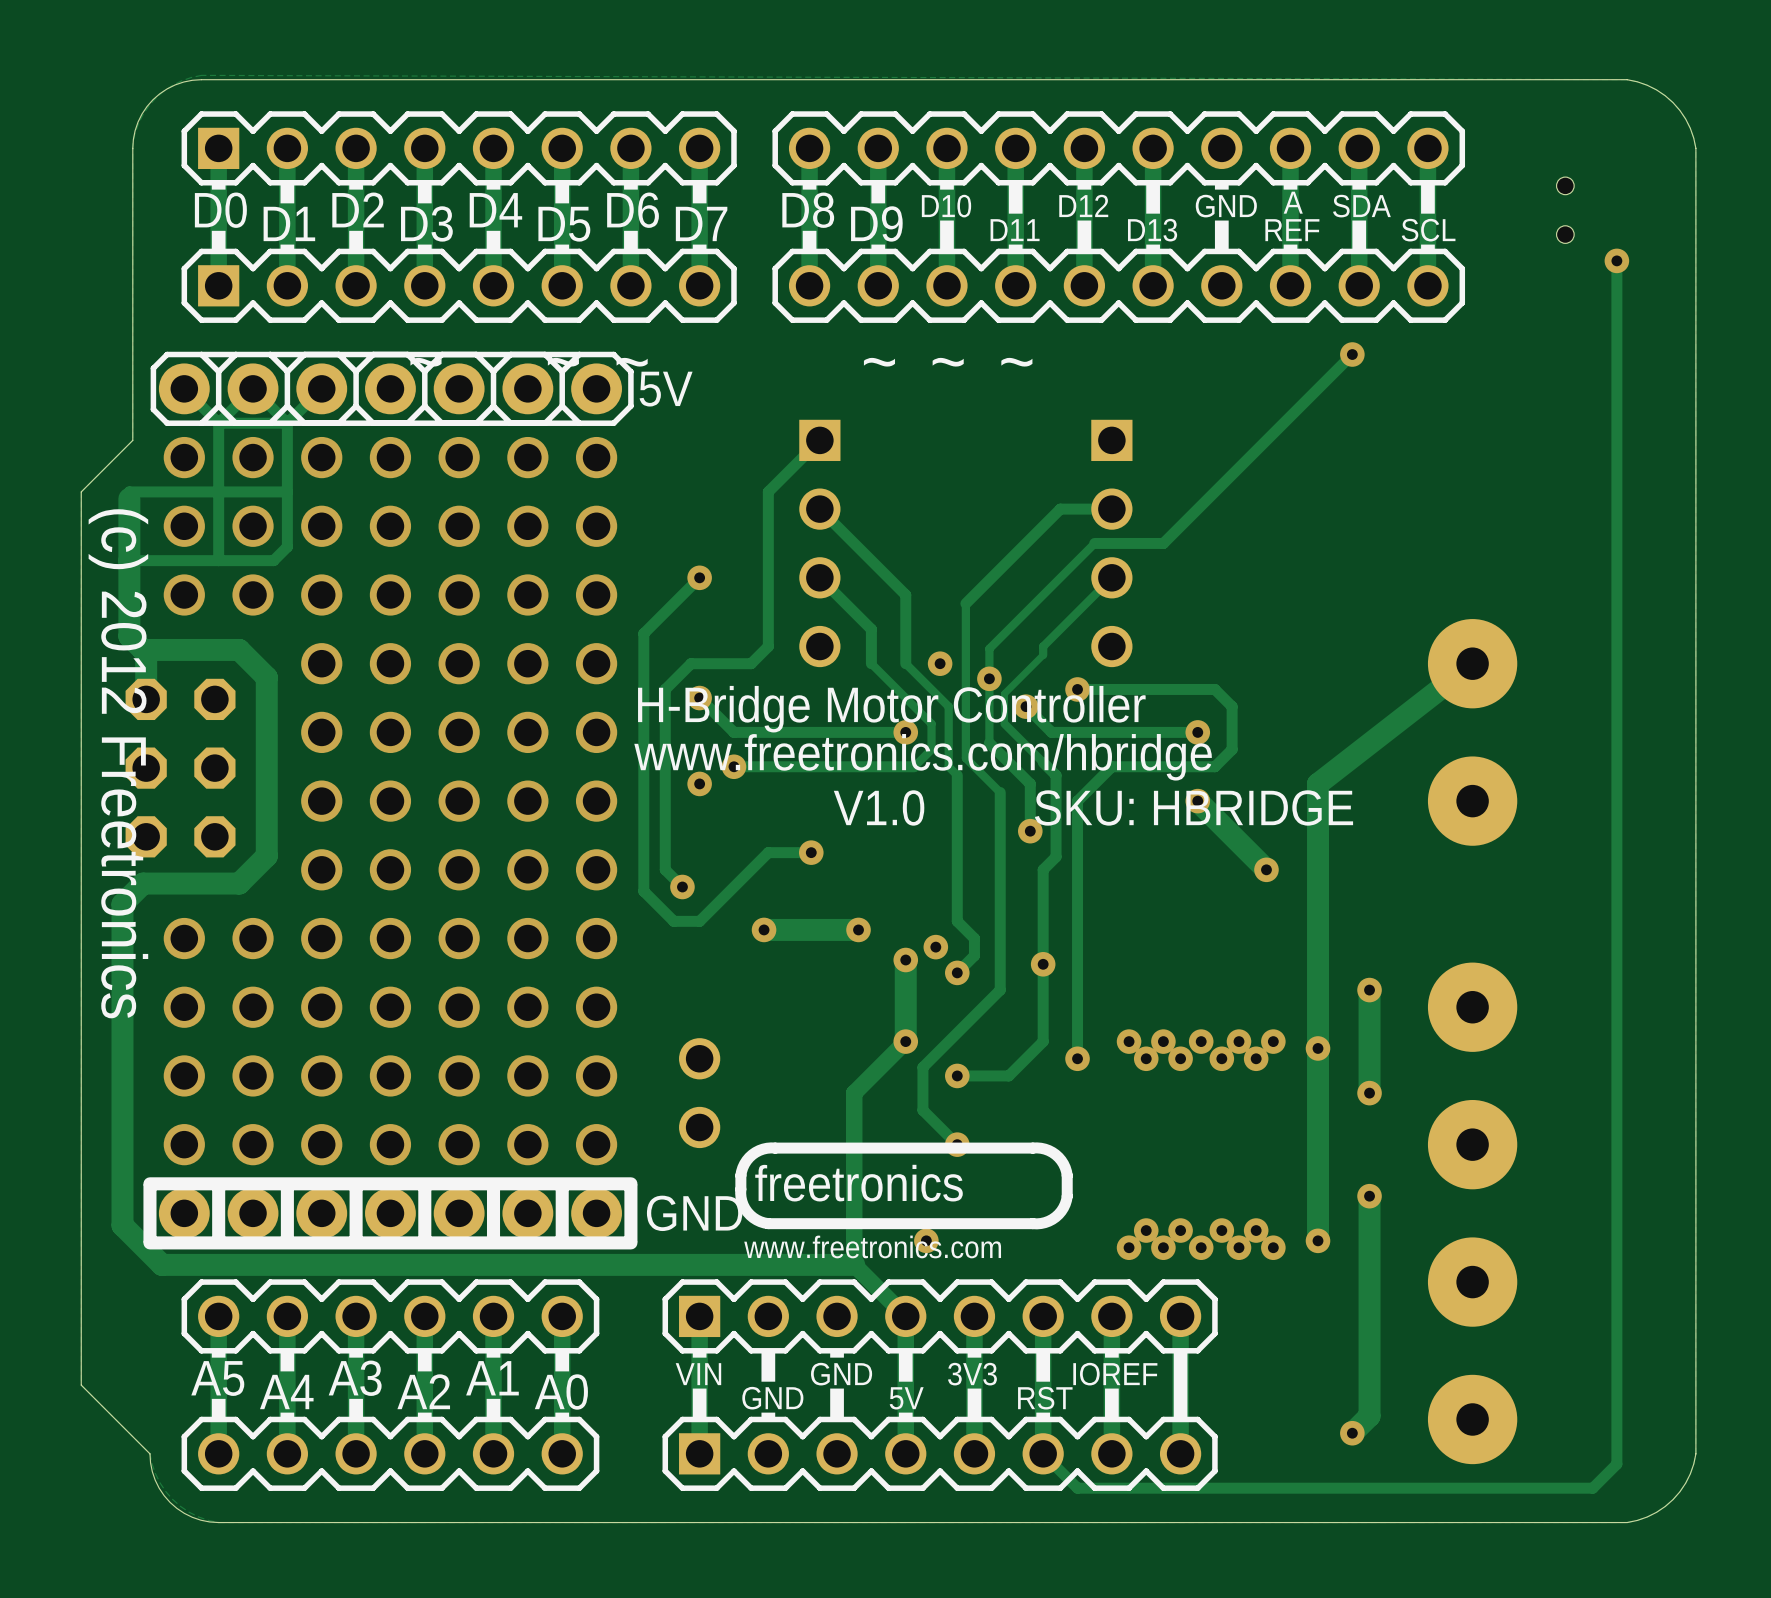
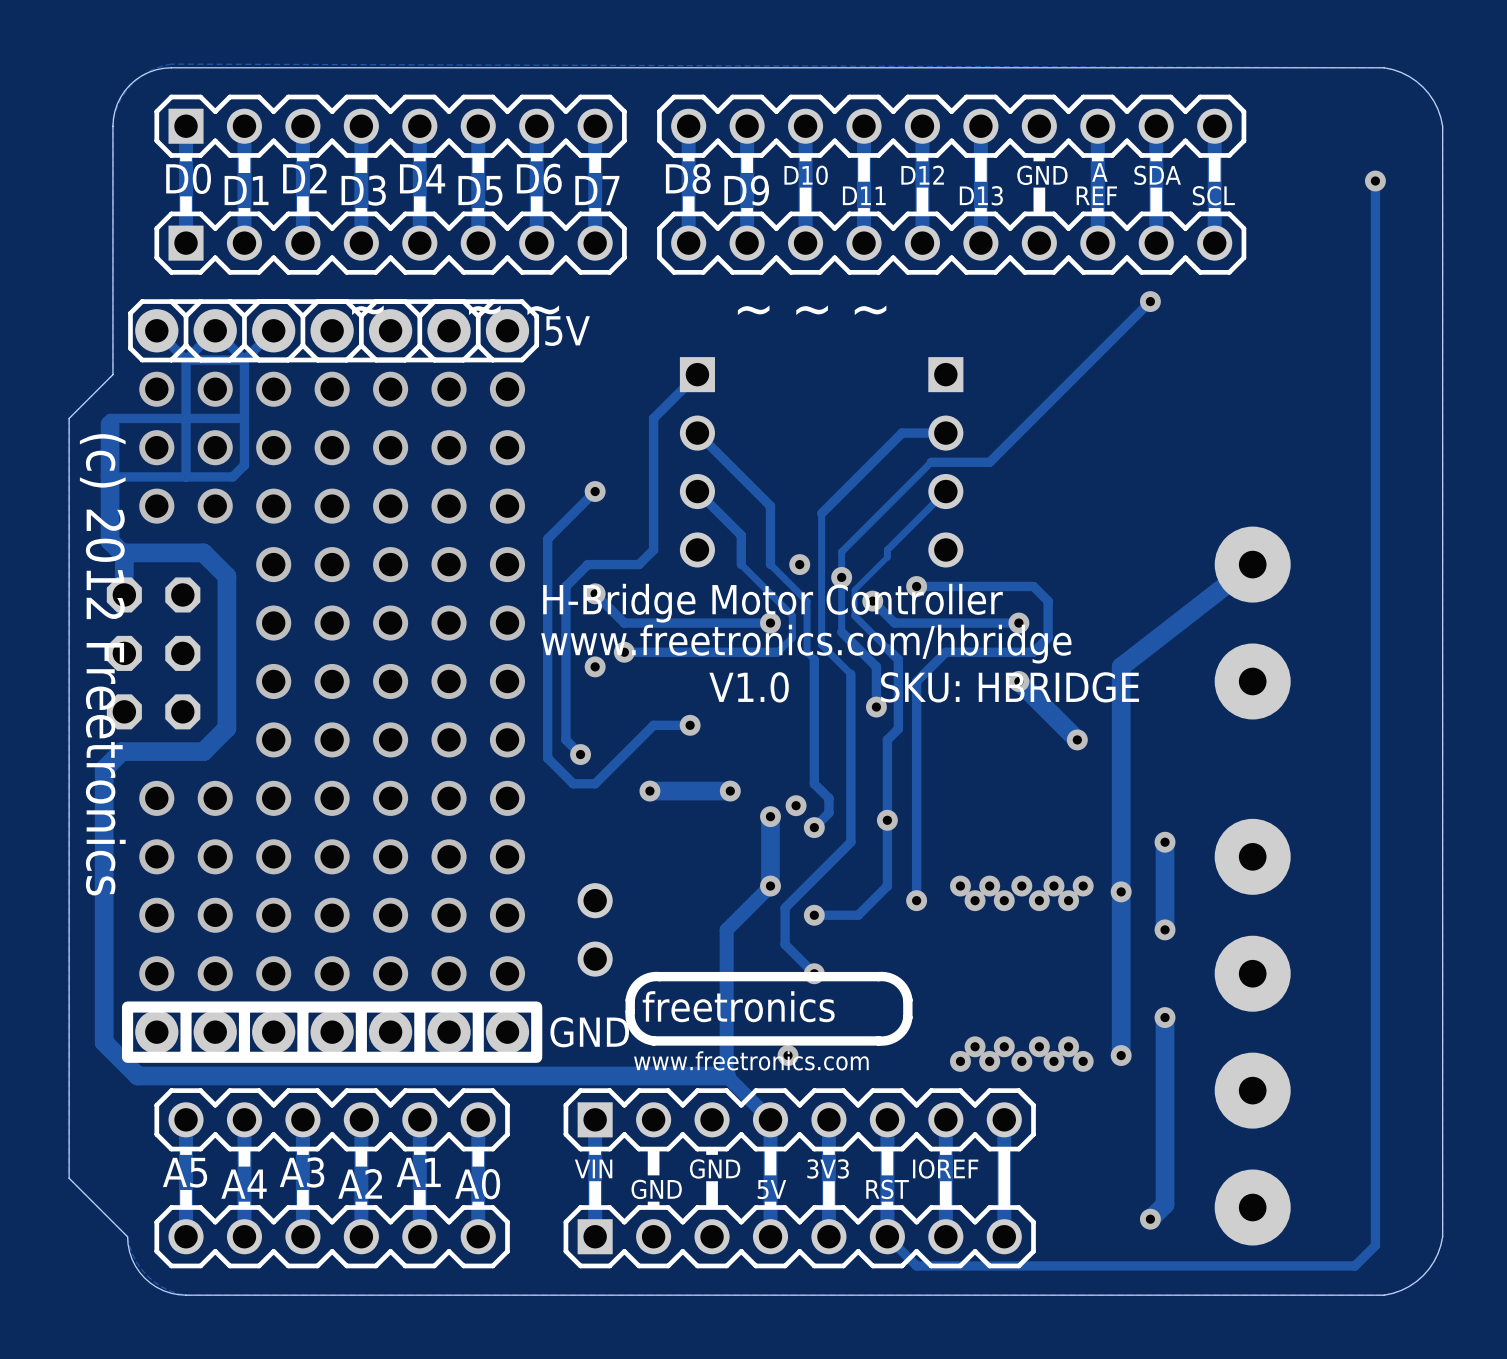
part: (1565, 210) -> none
track: none -> (1375, 181) (1375, 221)
via position: (1616, 260) -> (1375, 181)

